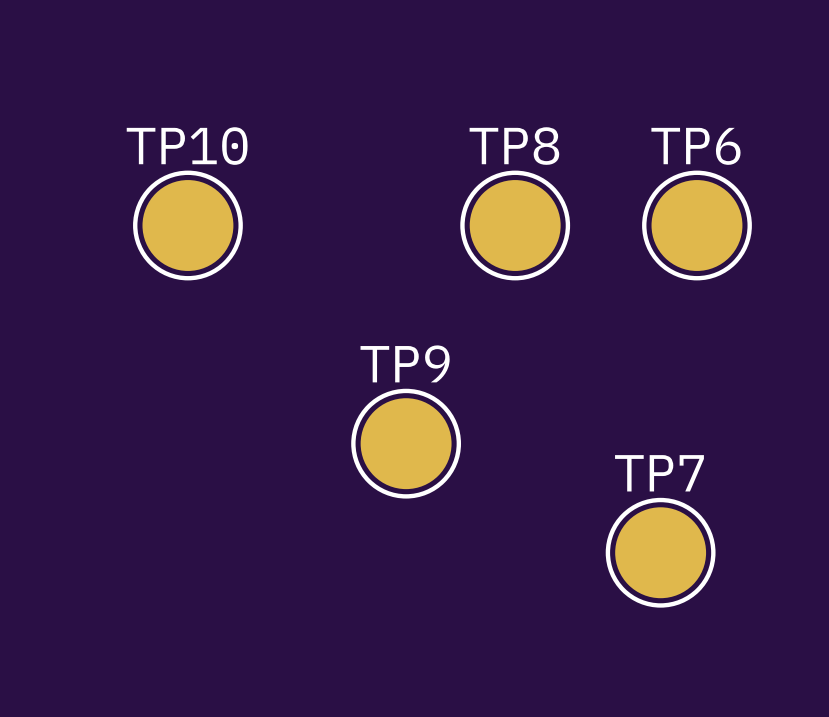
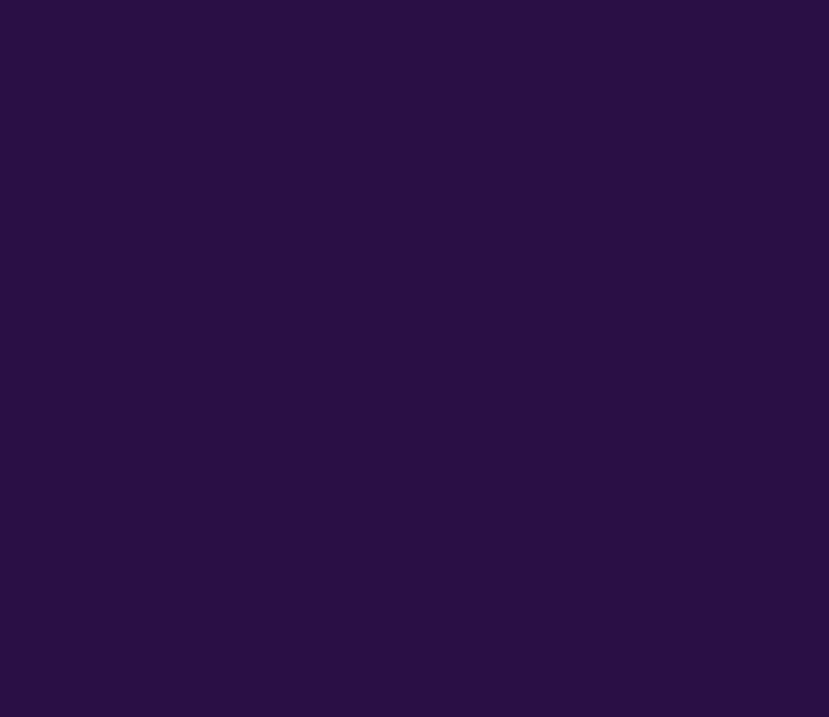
TP10: (187, 225) -> none
TP8: (515, 225) -> none
TP6: (696, 225) -> none
TP9: (406, 443) -> none
TP7: (660, 552) -> none

